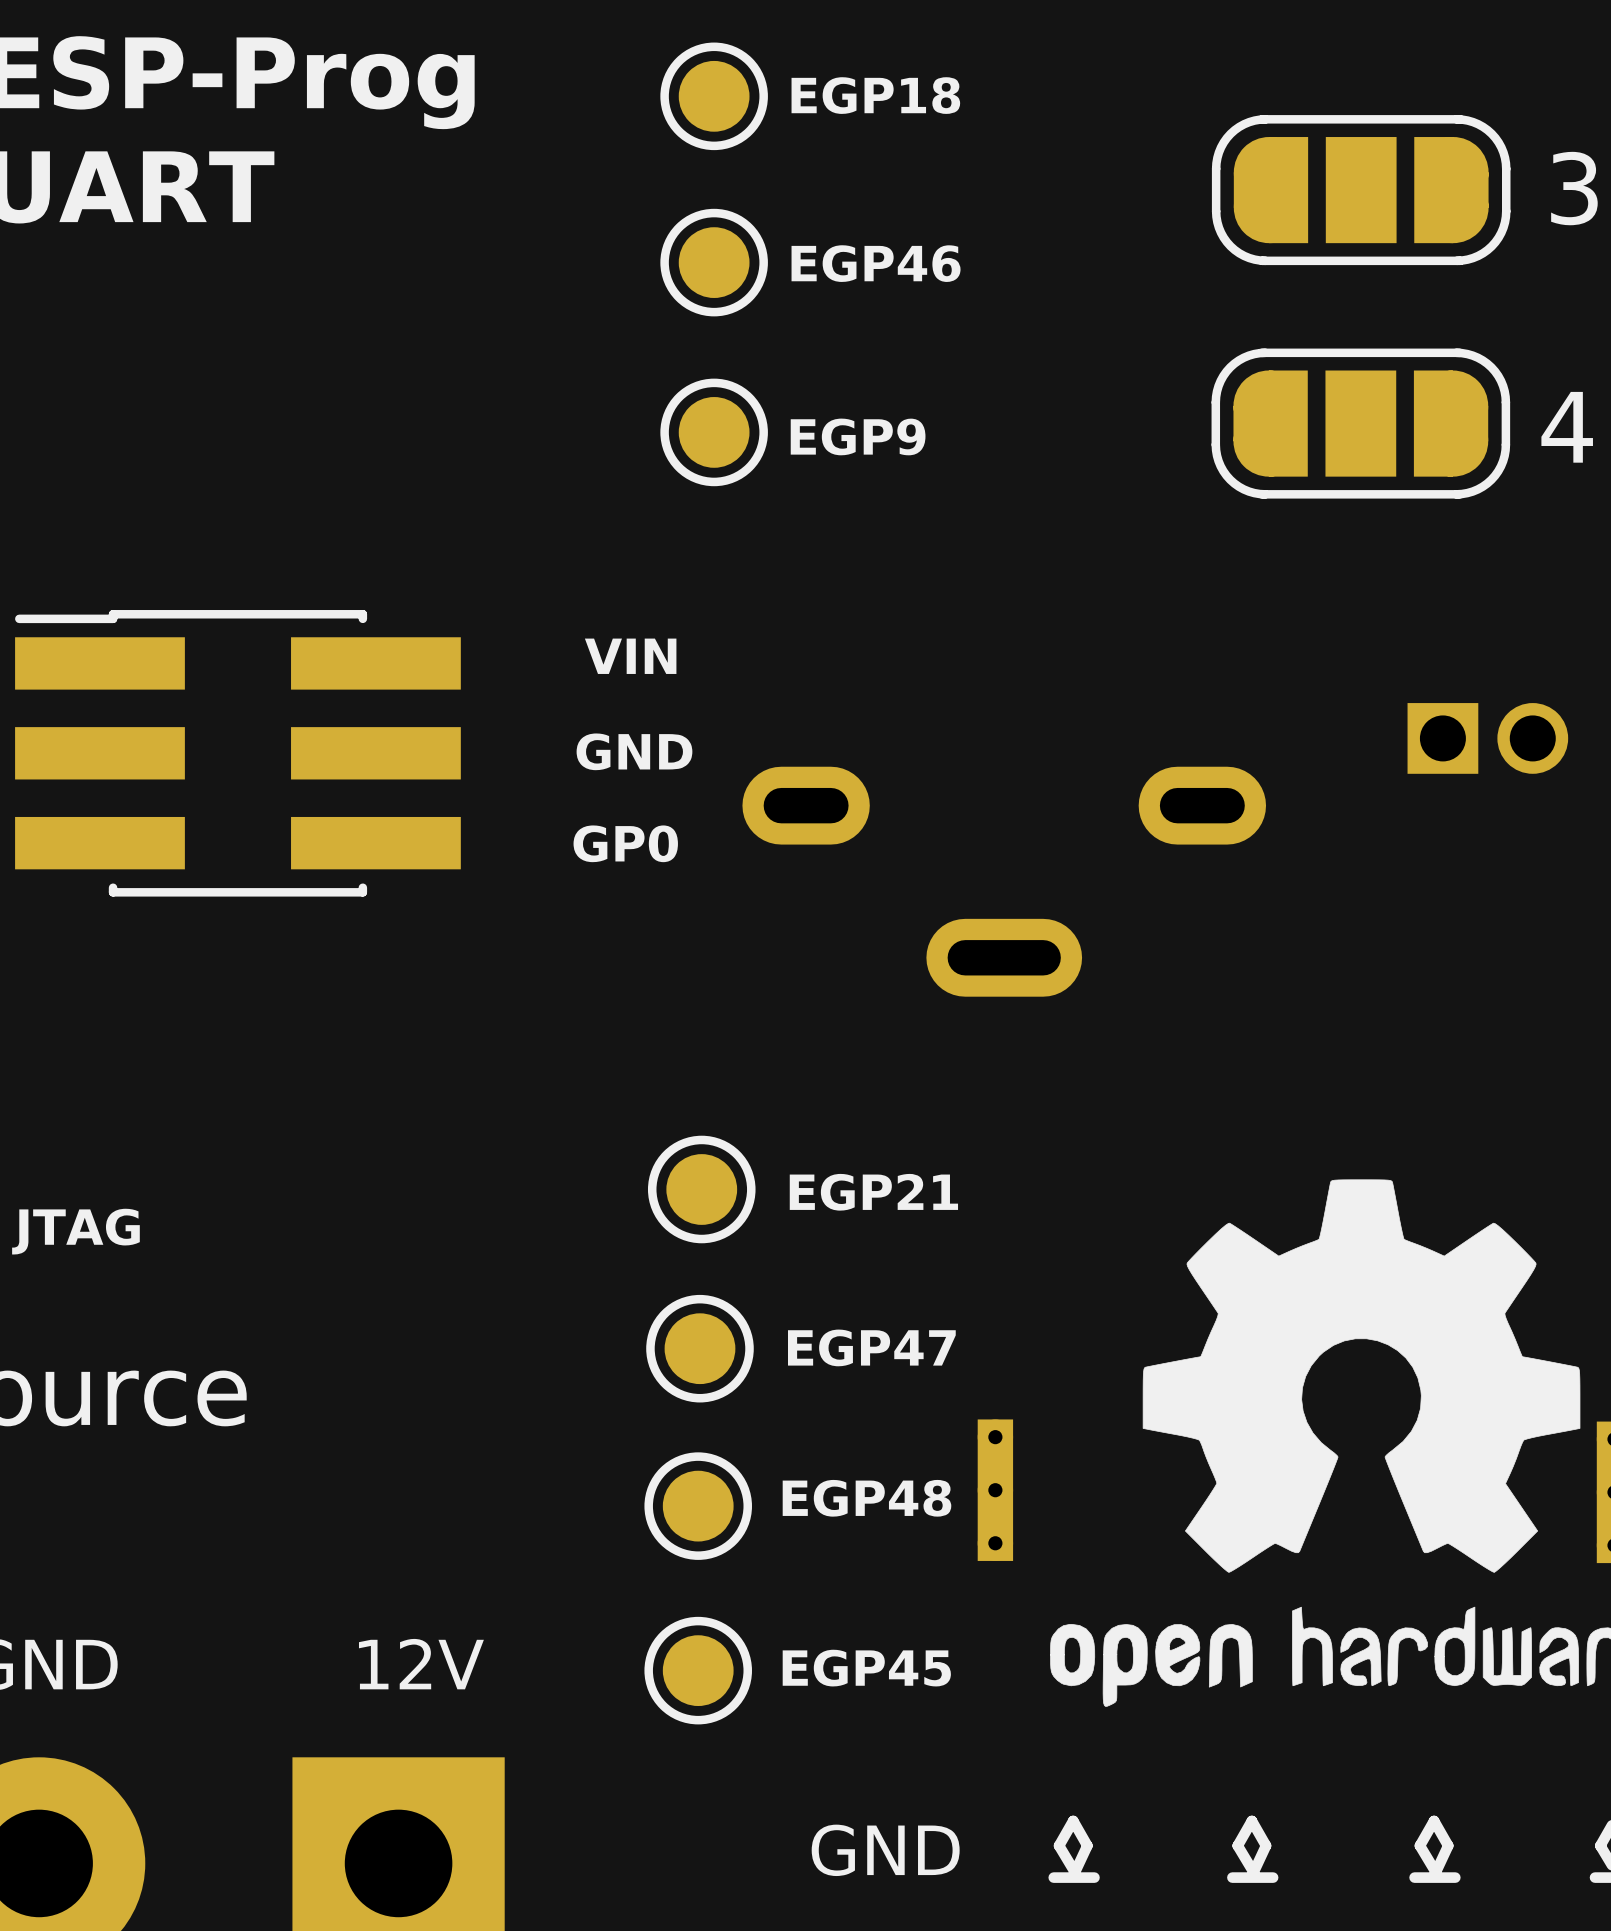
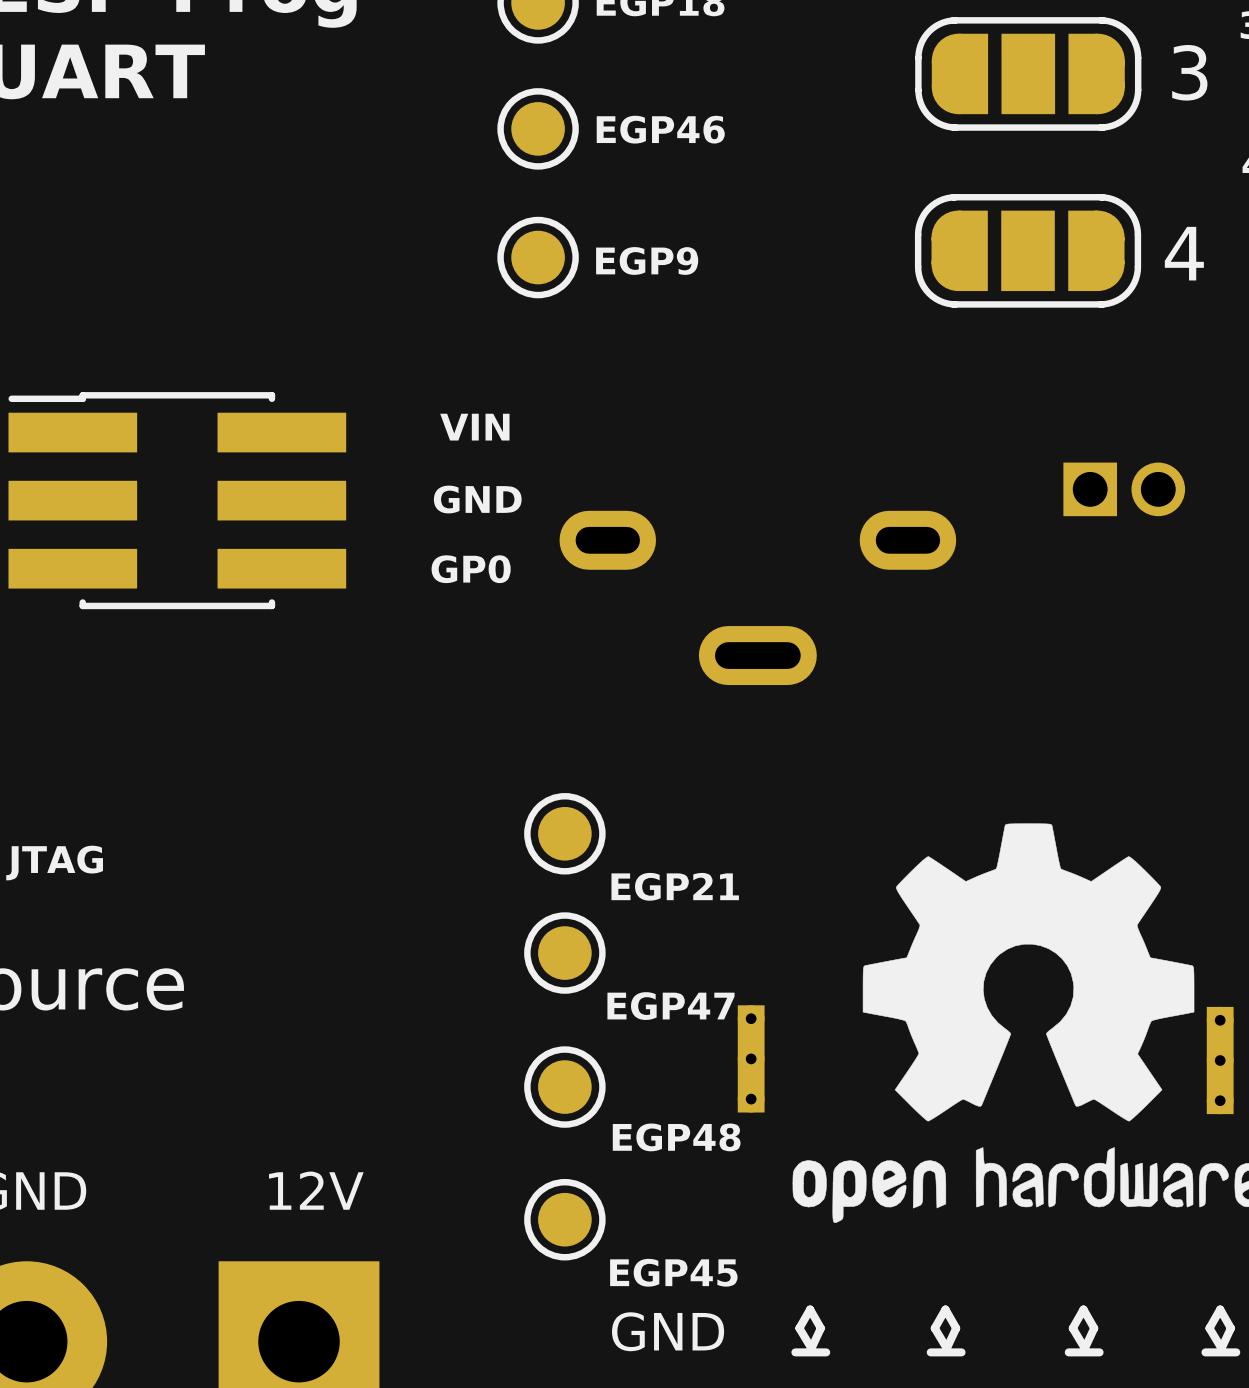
part position: (701, 1189) -> (564, 833)
text position: EGP21 (873, 1192) -> EGP21 (675, 886)
text position: EGP47 (871, 1347) -> EGP47 (670, 1006)
part position: (699, 1348) -> (564, 953)
text position: EGP48 (866, 1498) -> EGP48 (676, 1137)
part position: (698, 1506) -> (564, 1087)
text position: EGP45 (866, 1668) -> EGP45 (673, 1272)
part position: (698, 1670) -> (564, 1219)

